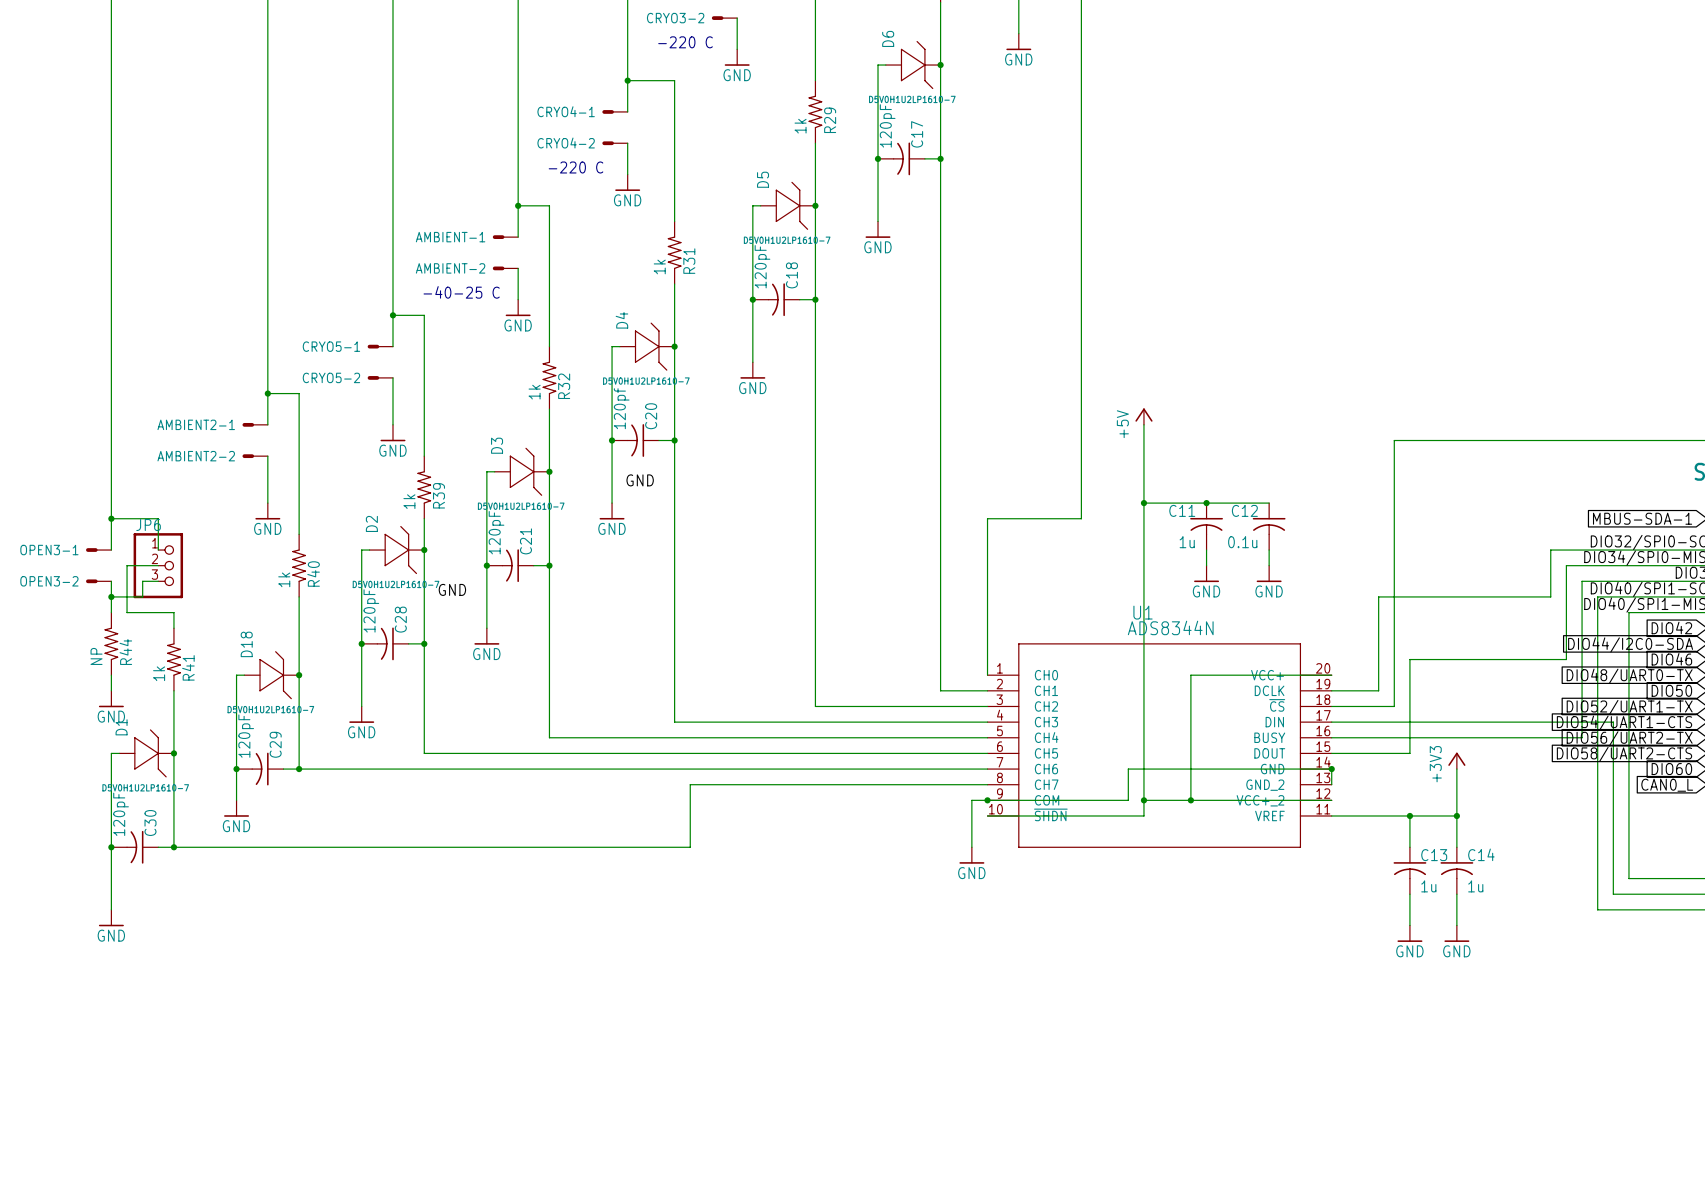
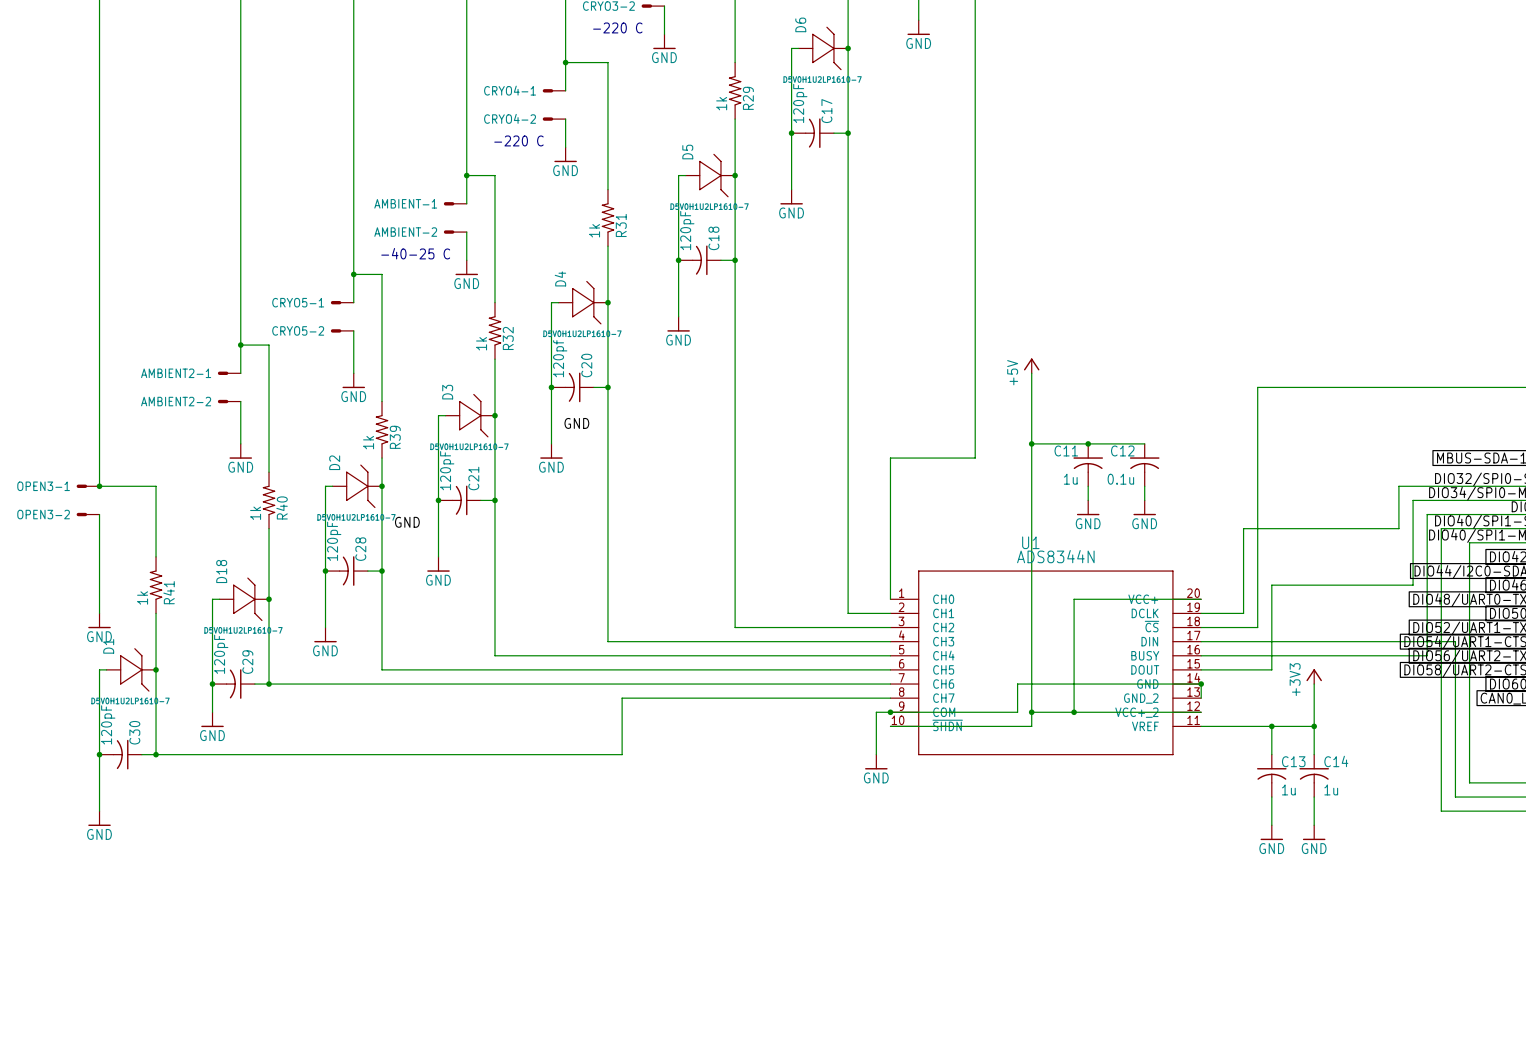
wire: (111, 518) (158, 518) (158, 550) -> none
junction: (111, 518) -> none
junction: none -> (99, 486)
wire: (158, 565) (127, 565) (127, 612) (173, 612) -> (99, 486) (156, 486) (156, 542)
JP6: (158, 565) -> none
wire: (158, 581) (142, 581) (142, 596) (111, 596) -> none
junction: (111, 596) -> none
R44: NP (111, 643) -> none

